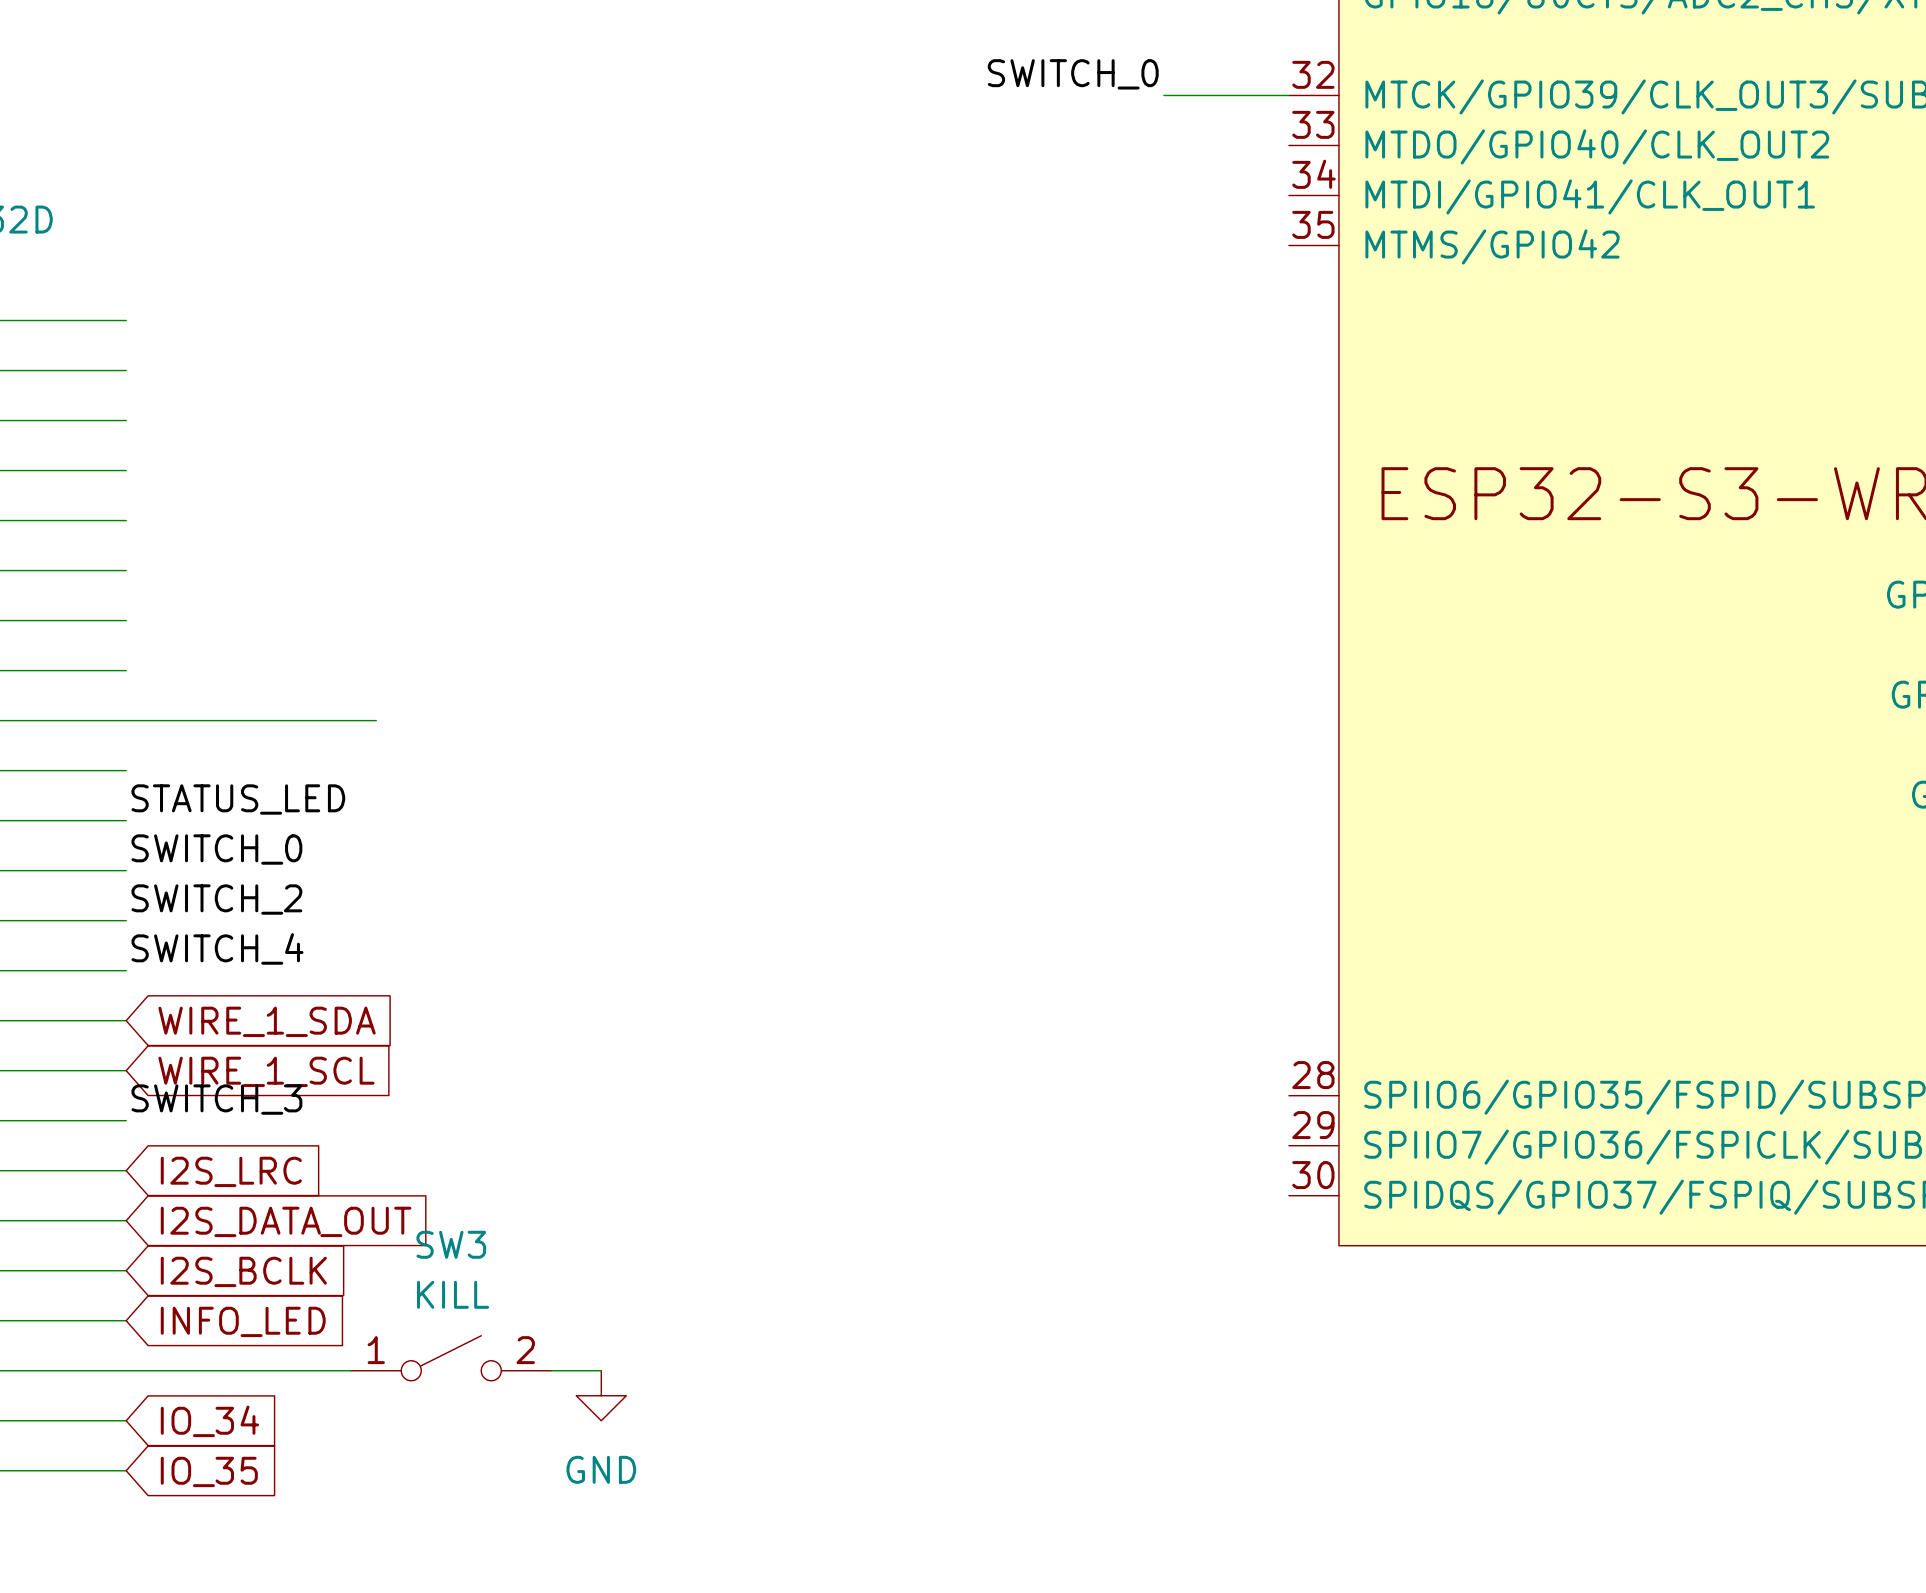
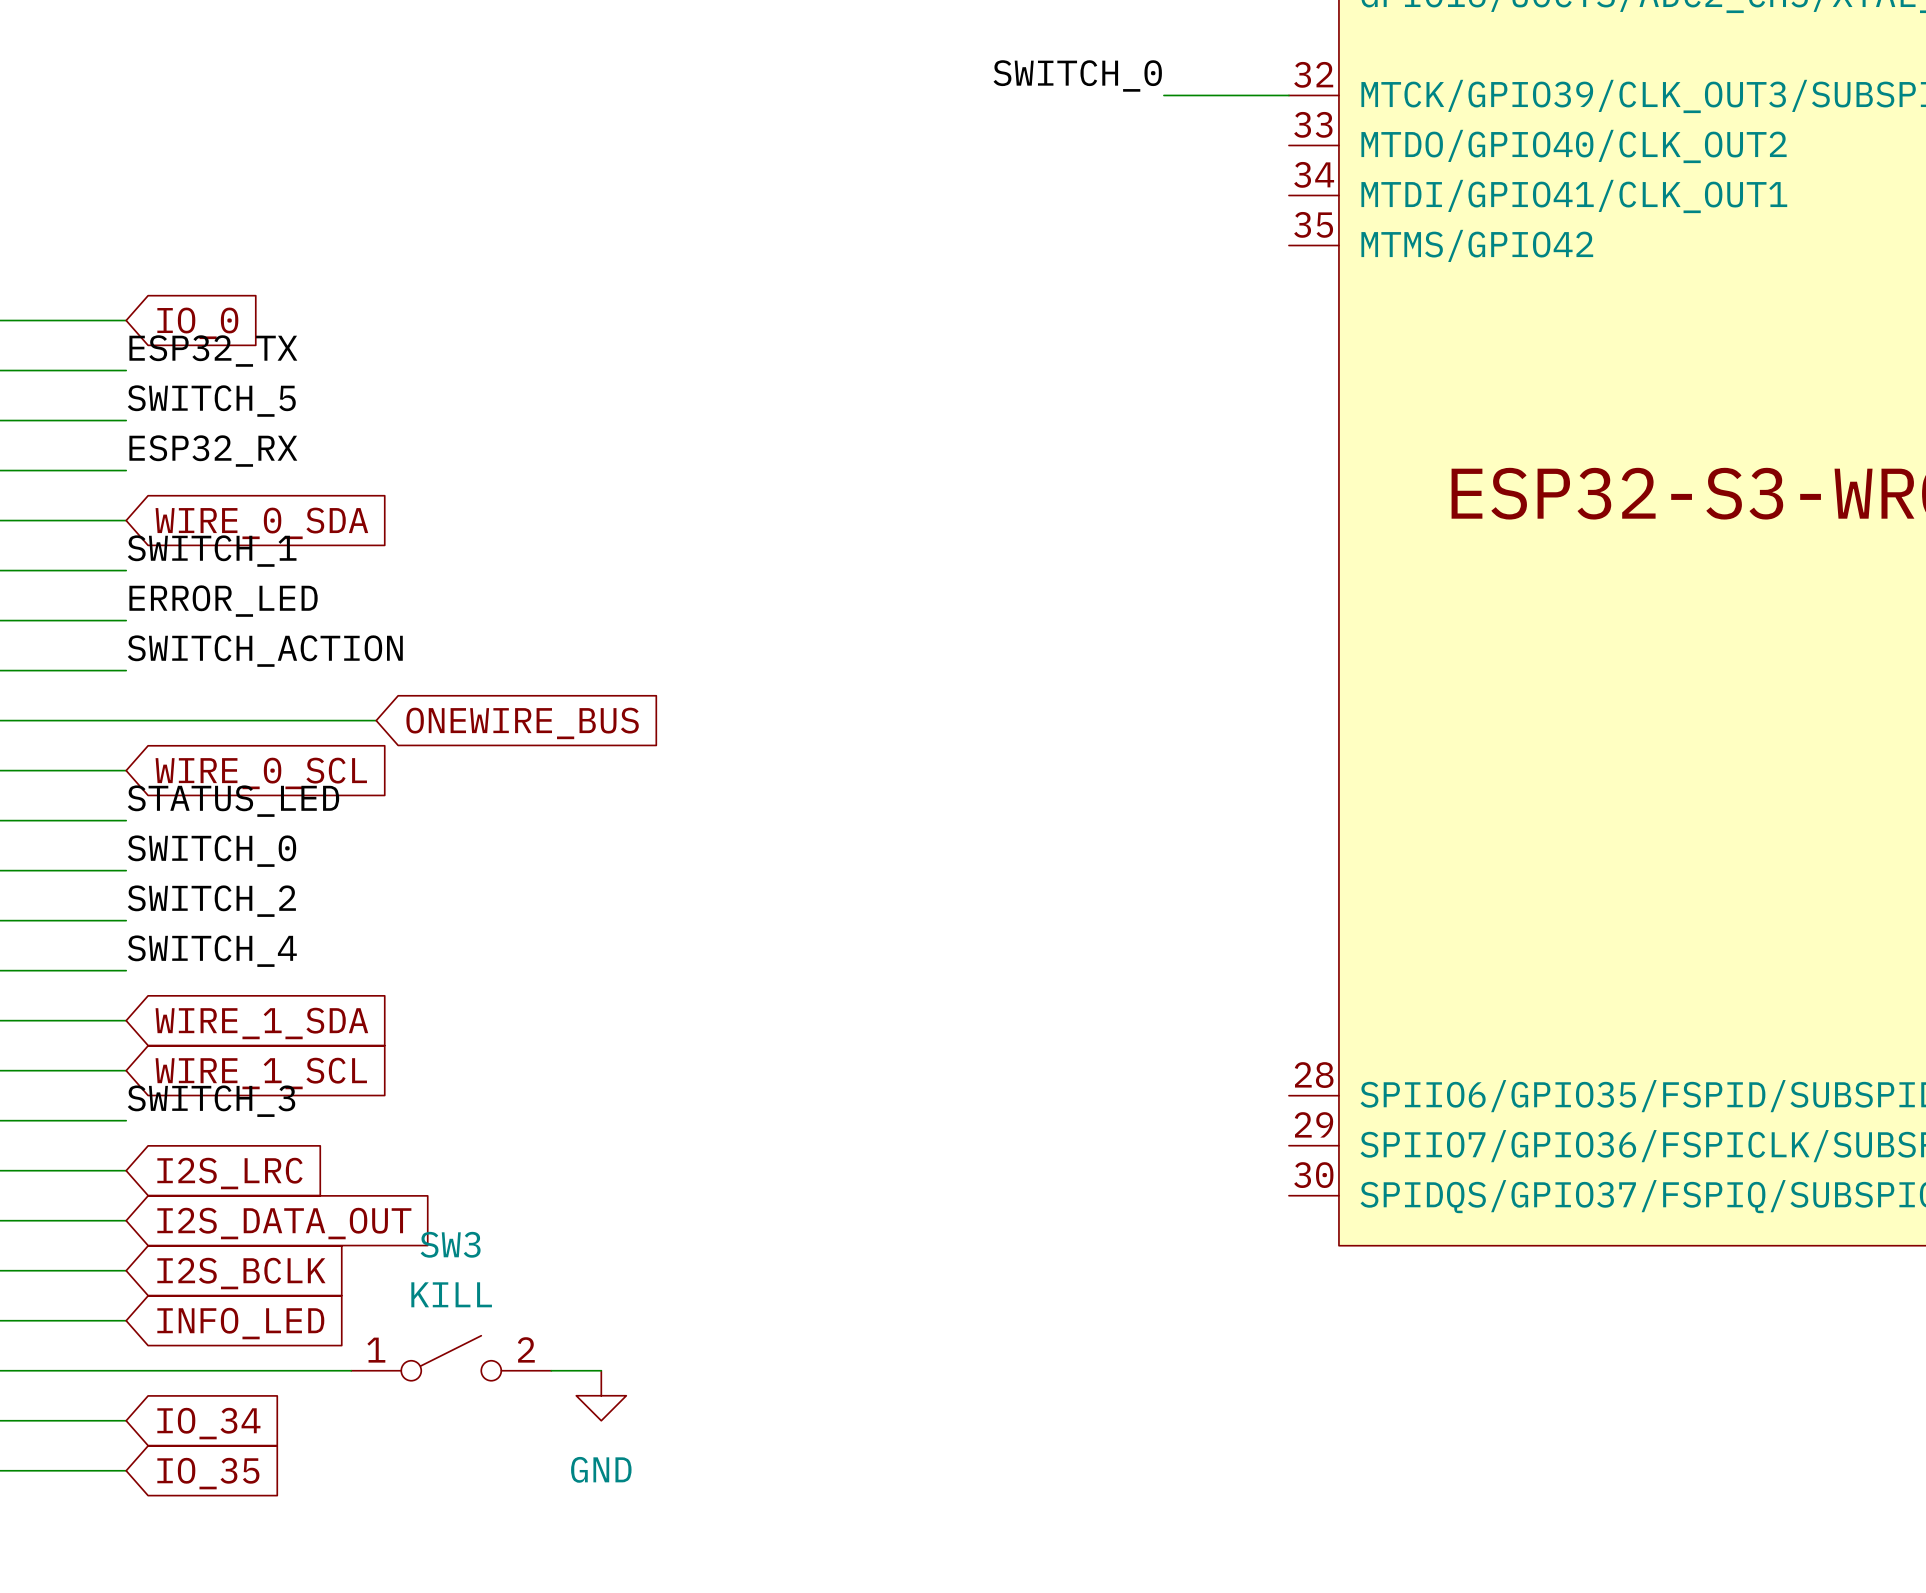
global label: none -> IO_0 (197, 323)
label: none -> ESP32_TX (213, 351)
label: none -> SWITCH_5 (211, 401)
label: none -> ESP32_RX (213, 451)
global label: none -> WIRE_0_SDA (261, 523)
label: none -> SWITCH_1 (212, 551)
label: none -> ERROR_LED (223, 601)
label: none -> SWITCH_ACTION (265, 651)
global label: none -> ONEWIRE_BUS (522, 723)
global label: none -> WIRE_0_SCL (261, 773)

